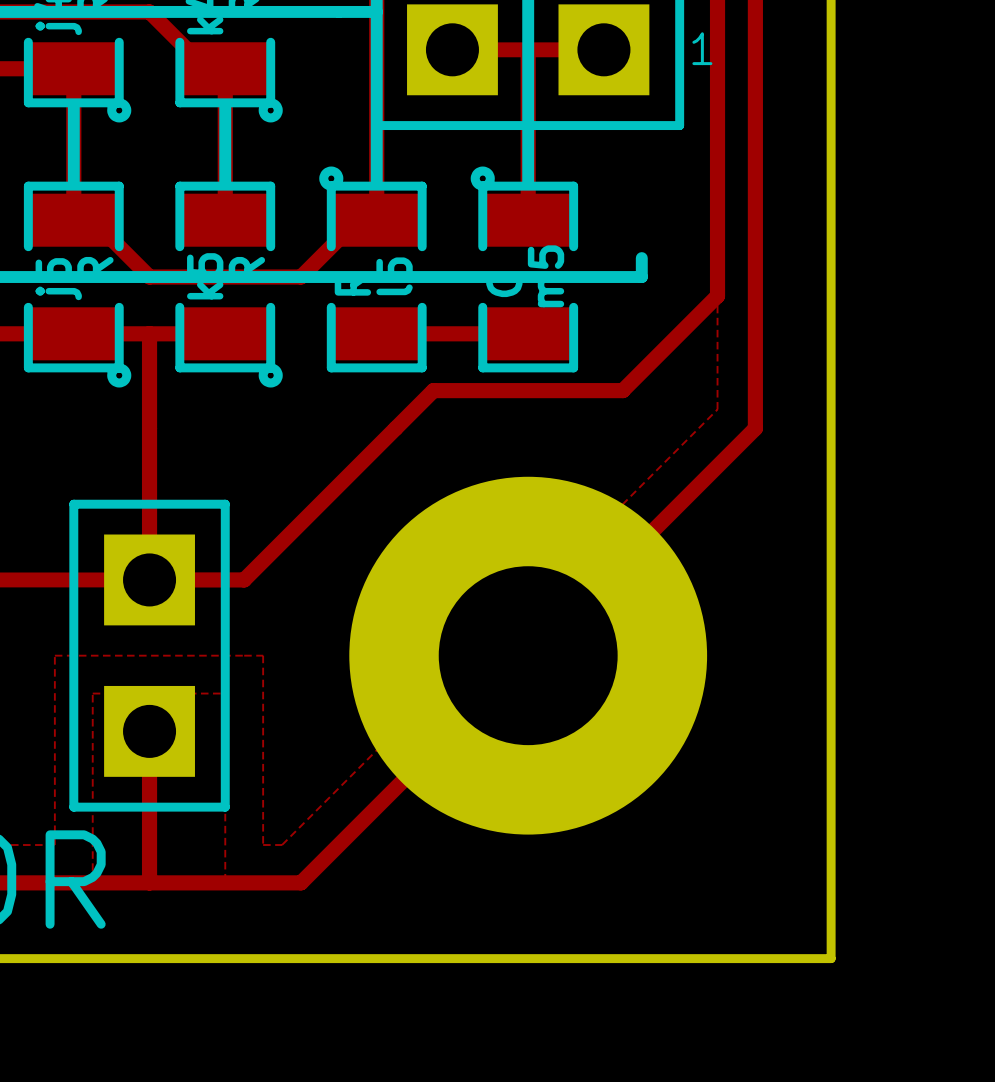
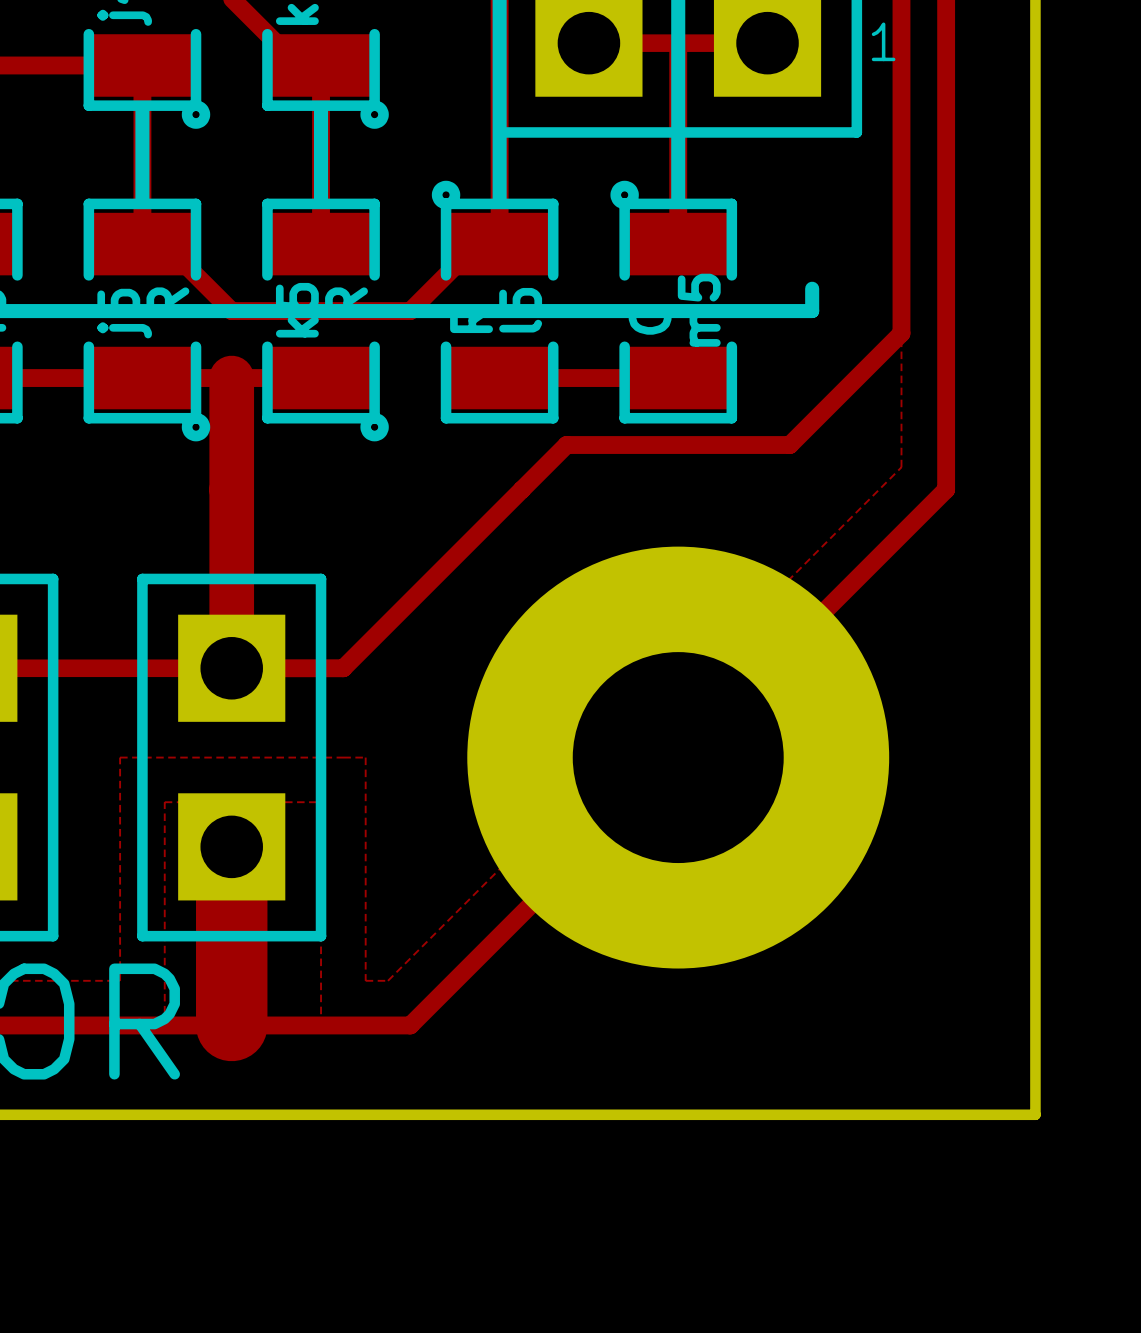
track width: thin (149, 333) (149, 579) -> thick (231, 378) (231, 668)
track width: thin (149, 731) (149, 882) -> thick (231, 846) (231, 1025)

